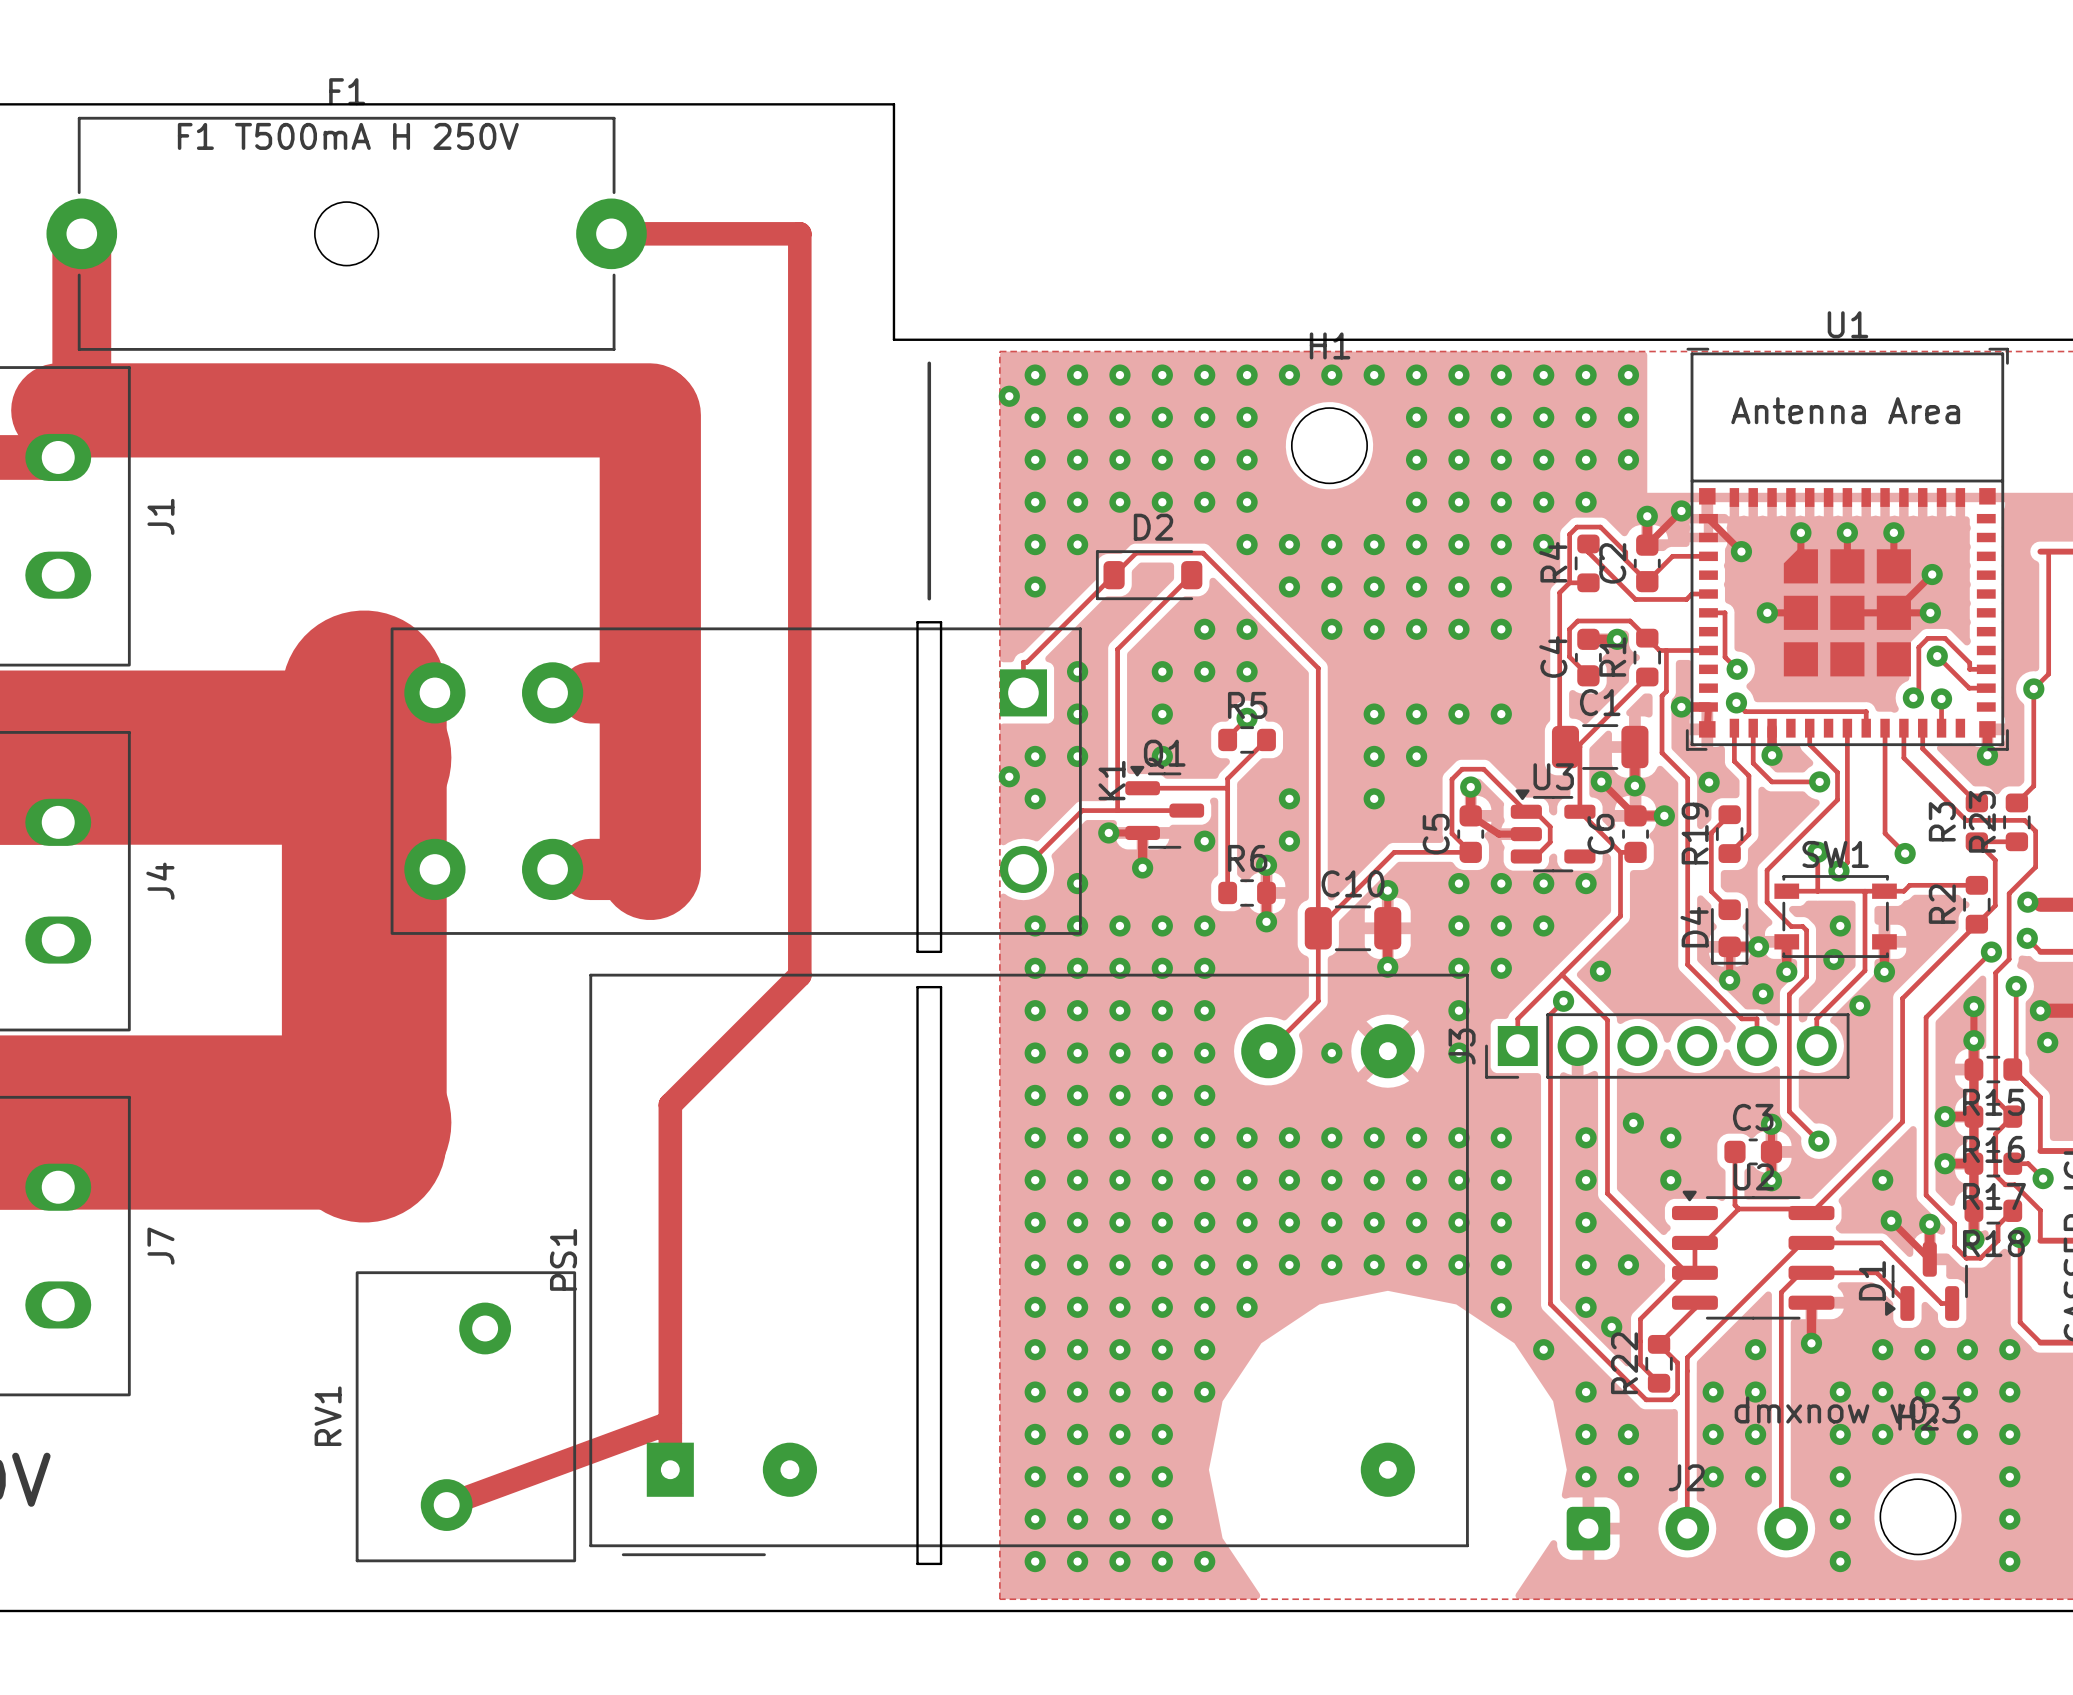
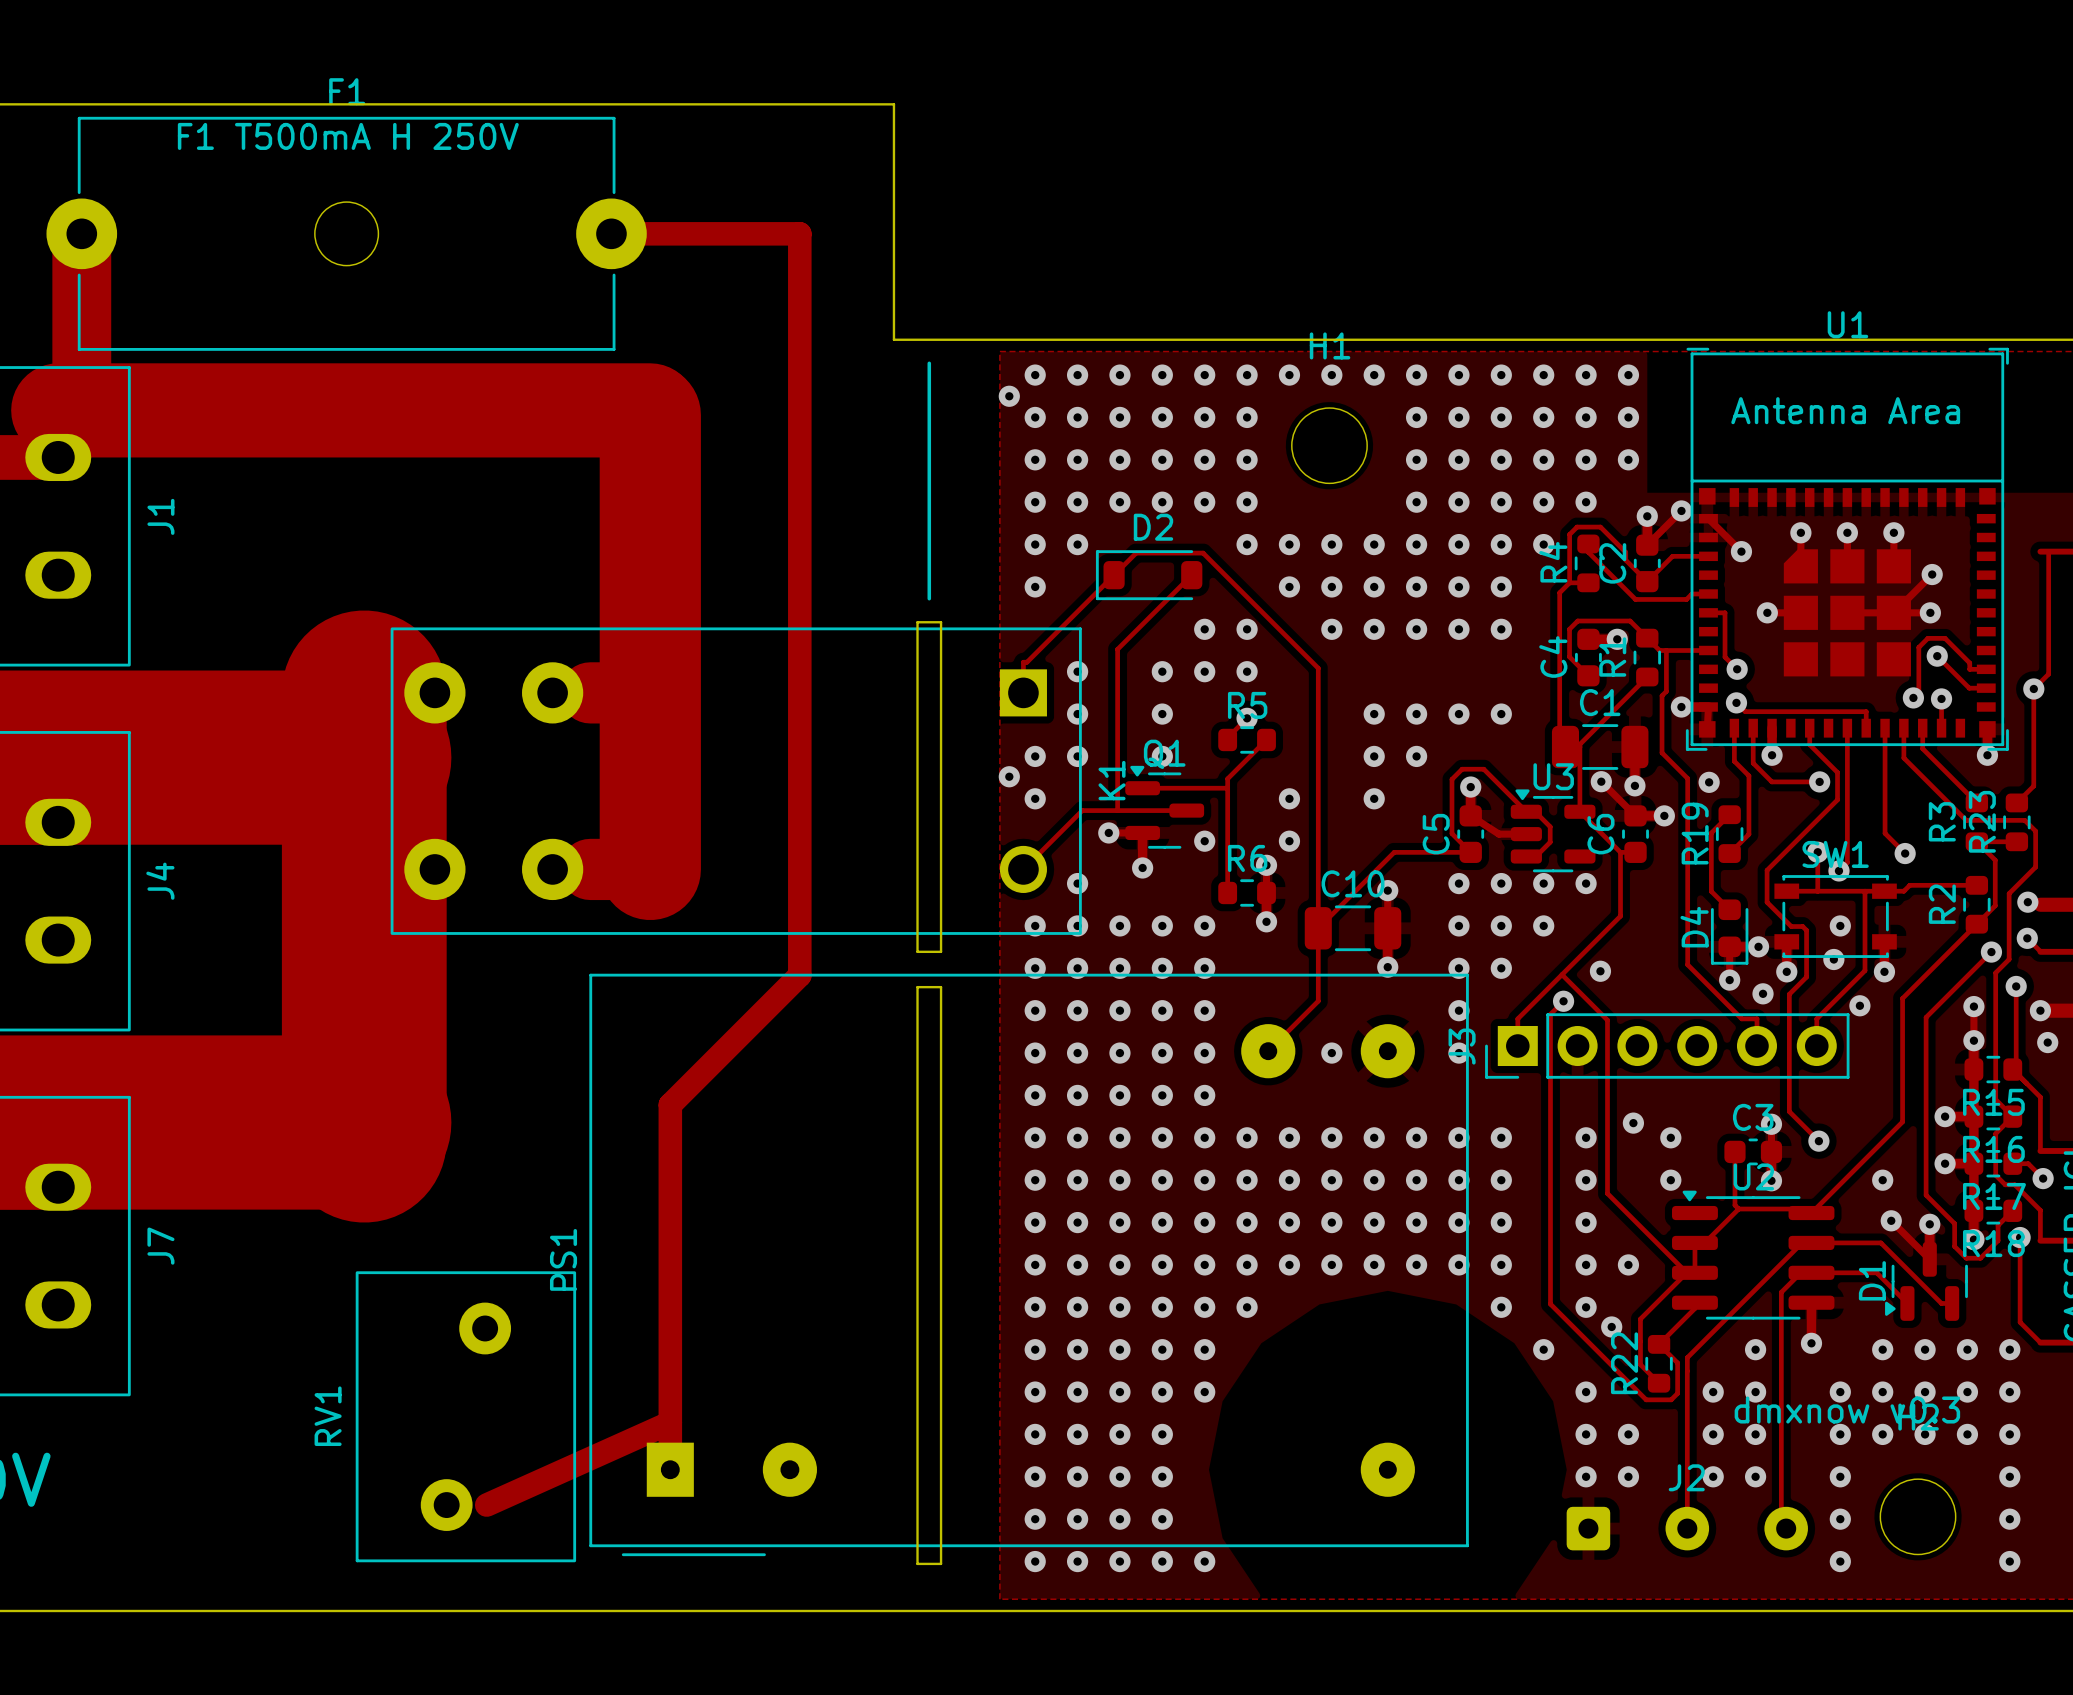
track: (670, 1422) (446, 1505) -> (670, 1422) (486, 1505)

